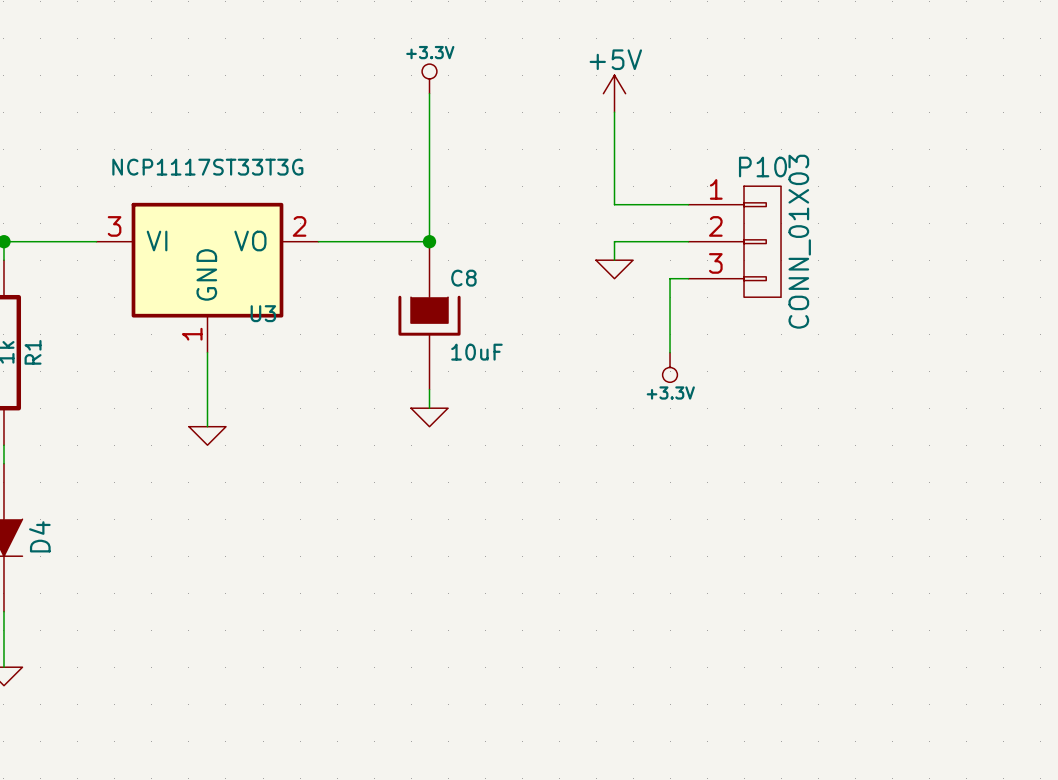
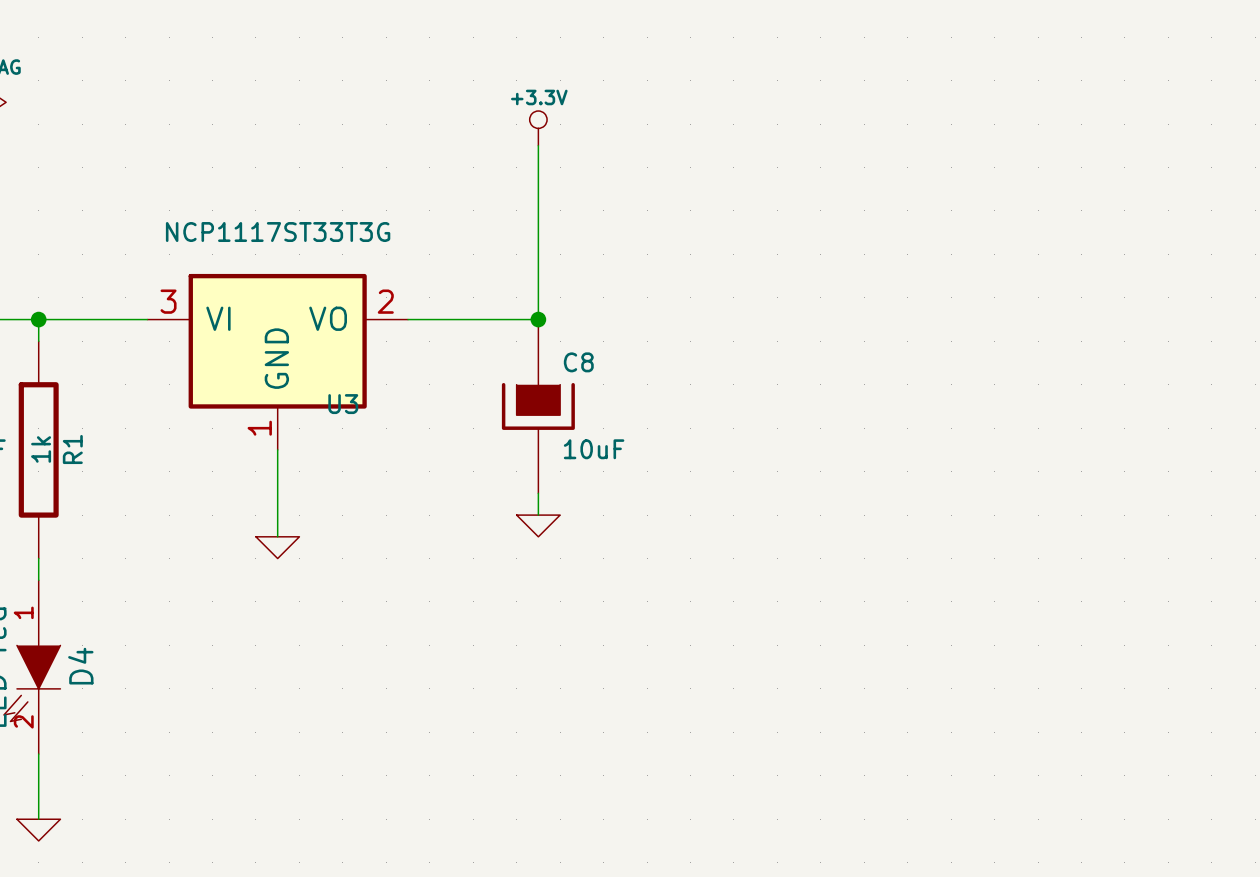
power symbol: +5V (614, 93) -> none
wire: (614, 112) (614, 204) (688, 204) -> none
wire: (688, 241) (614, 241) (614, 260) -> none
P10: CONN_01X03 (734, 241) -> none
power symbol: (614, 269) -> none
wire: (688, 278) (670, 278) (670, 352) -> none
power symbol: +3.3V (670, 367) -> none

